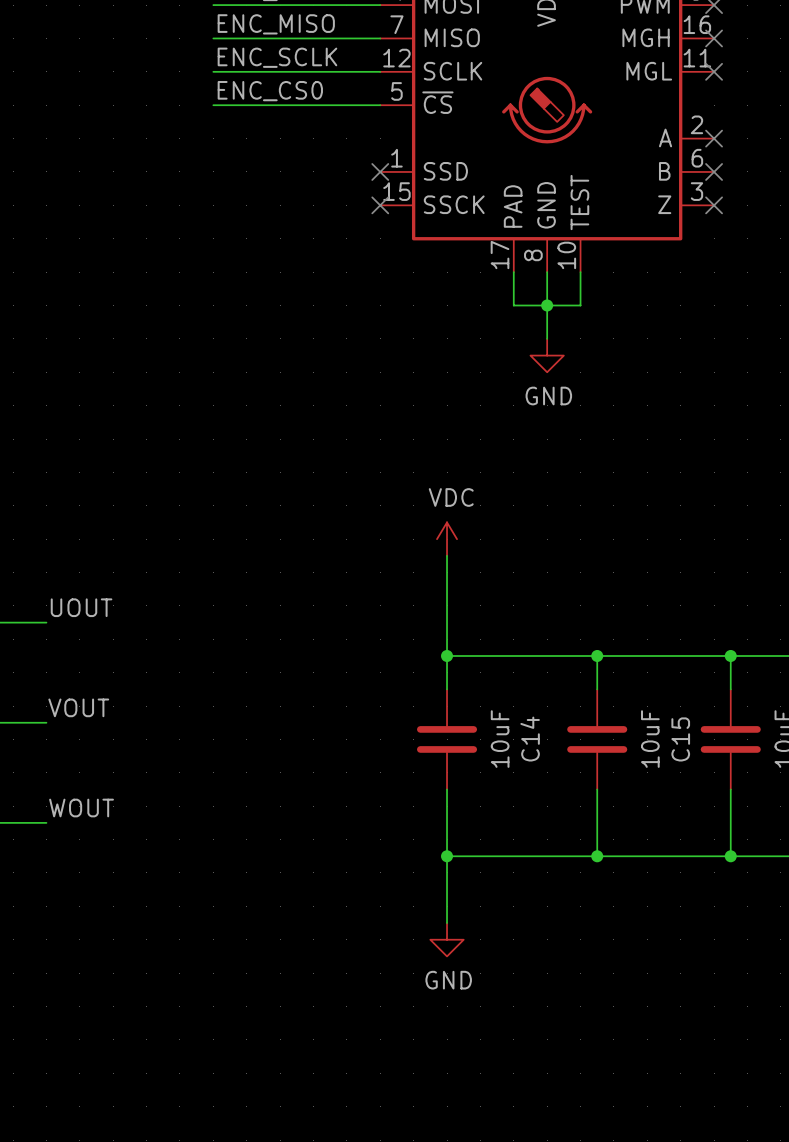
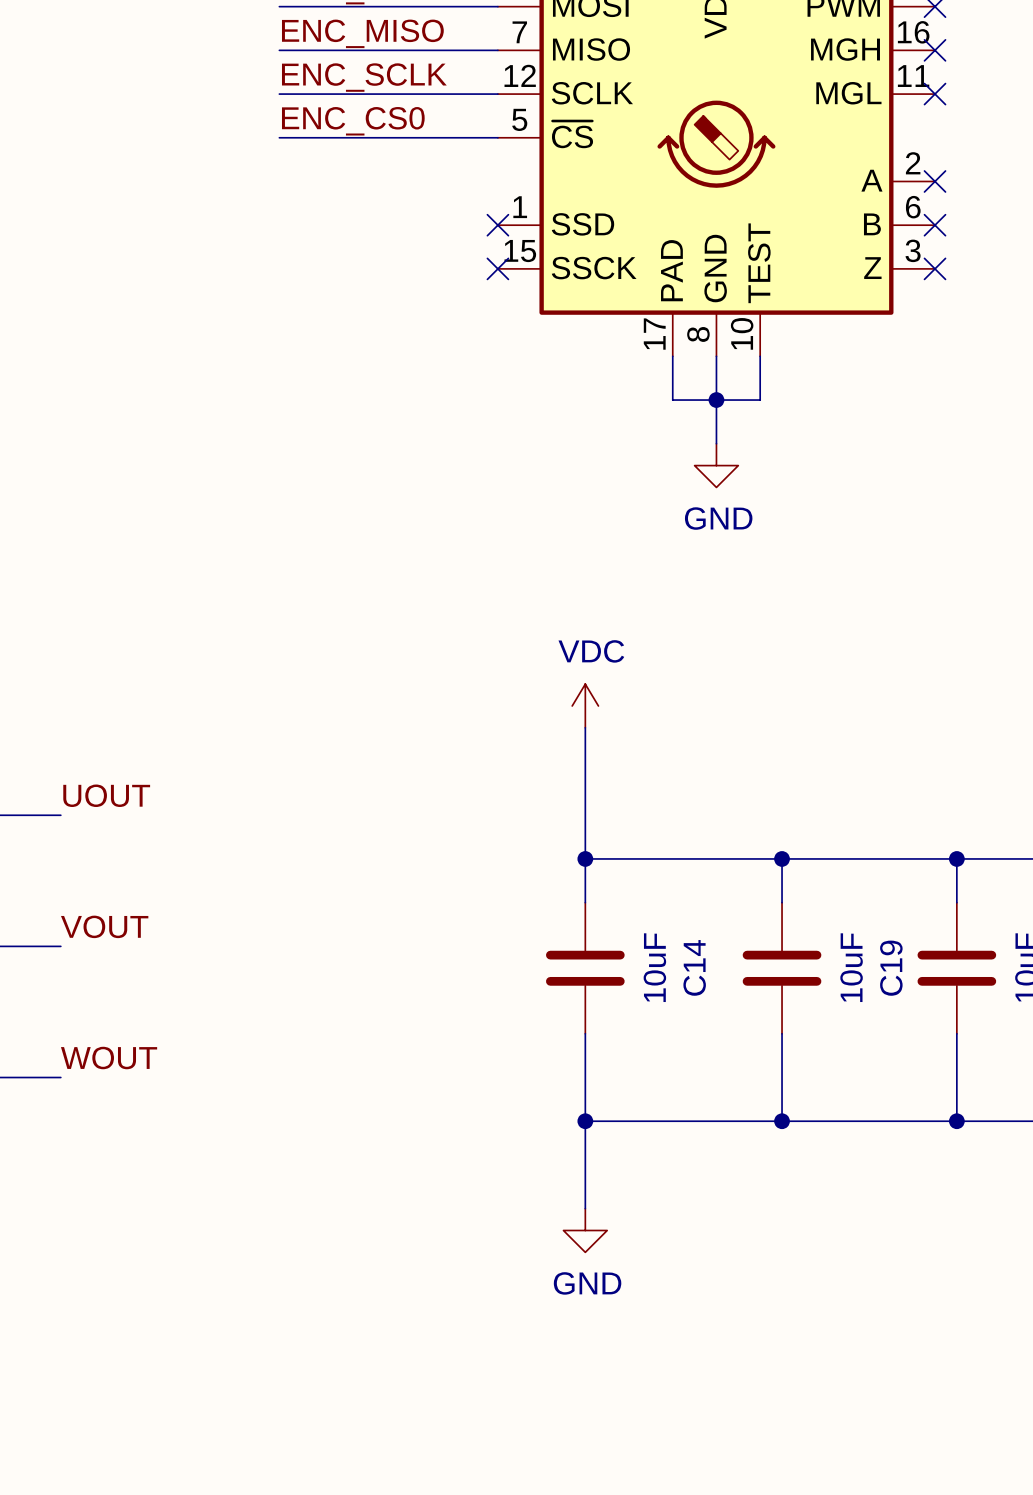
C15 name: C15 (680, 739) -> C19 (891, 968)

